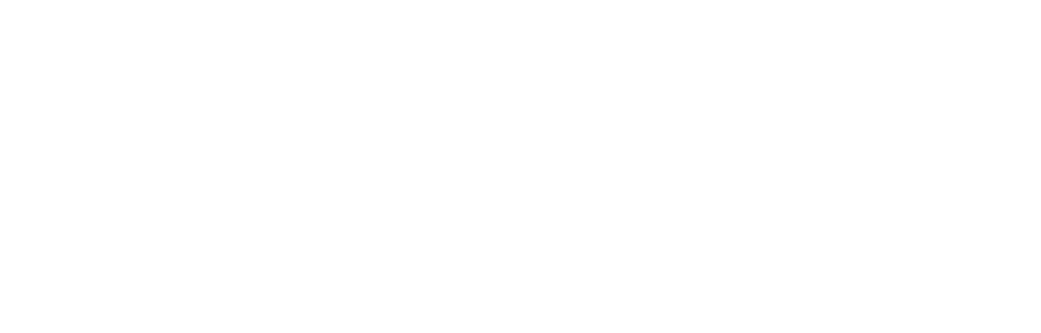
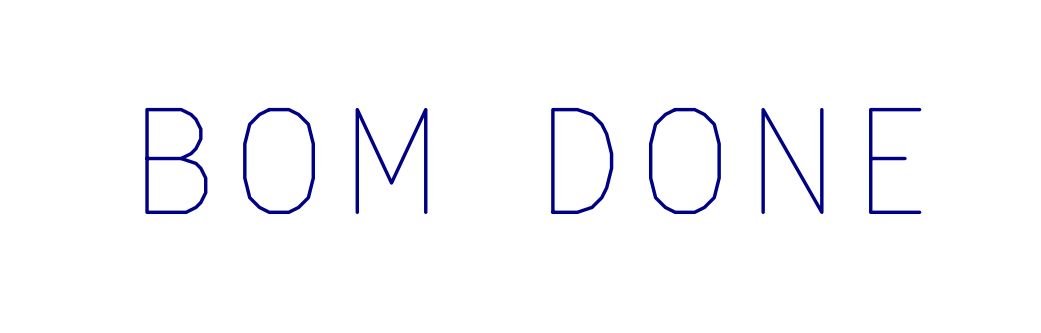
text: none -> BOM DONE (533, 160)

